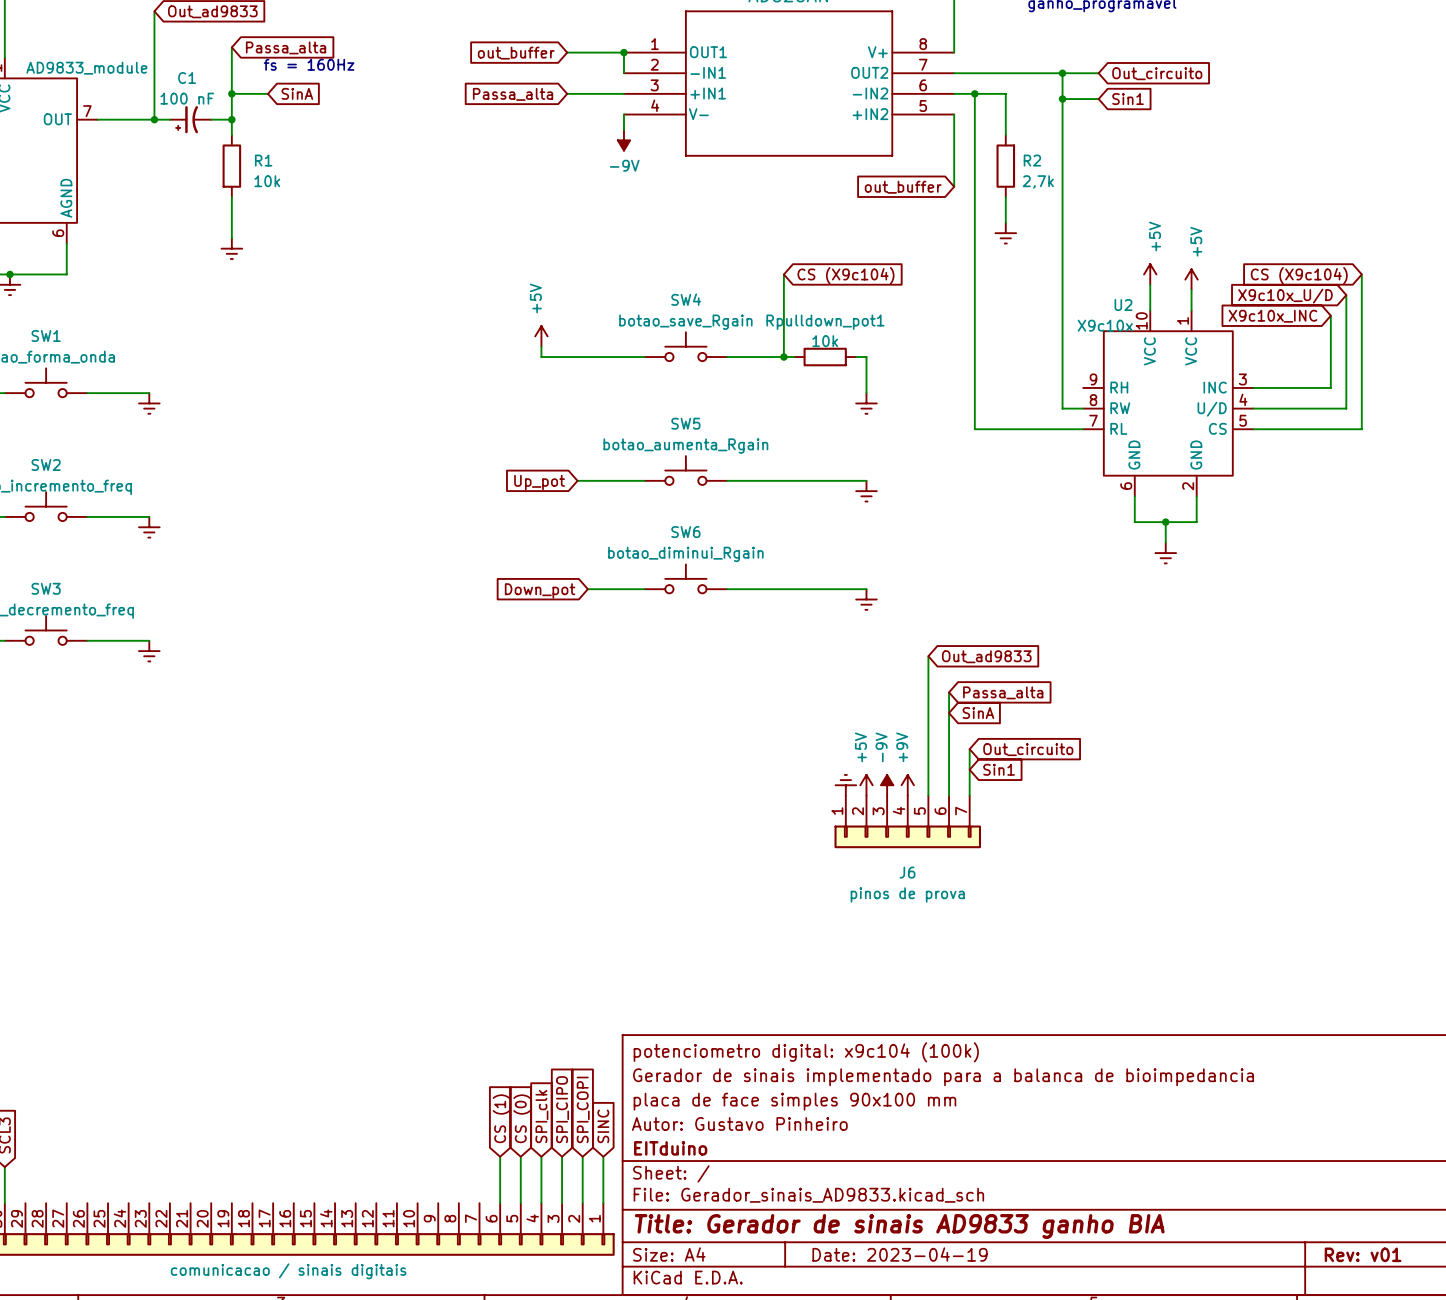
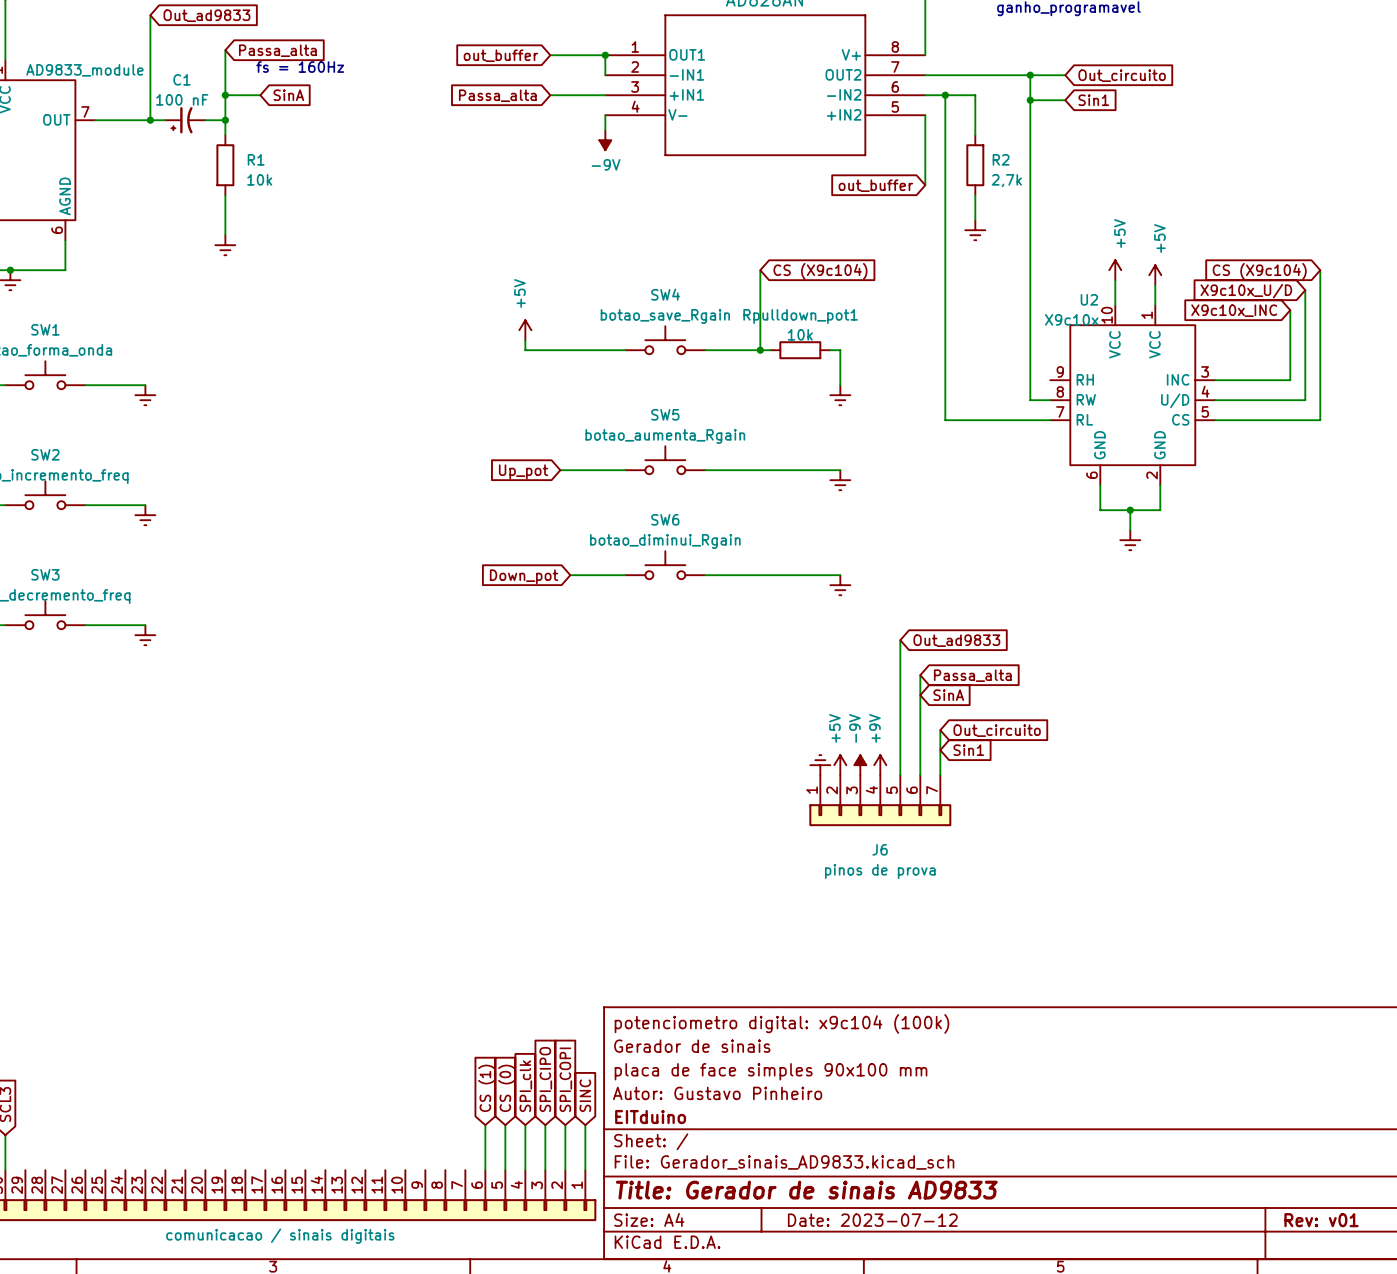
title block: Gerador de sinais implementado para a balanca de bioimpedancia (943, 1077) -> Gerador de sinais (692, 1046)
title block: Title: Gerador de sinais AD9833 ganho BIA (899, 1226) -> Title: Gerador de sinais AD9833 (806, 1190)
title block: Date: 2023-04-19 (900, 1254) -> Date: 2023-07-12 (872, 1220)

